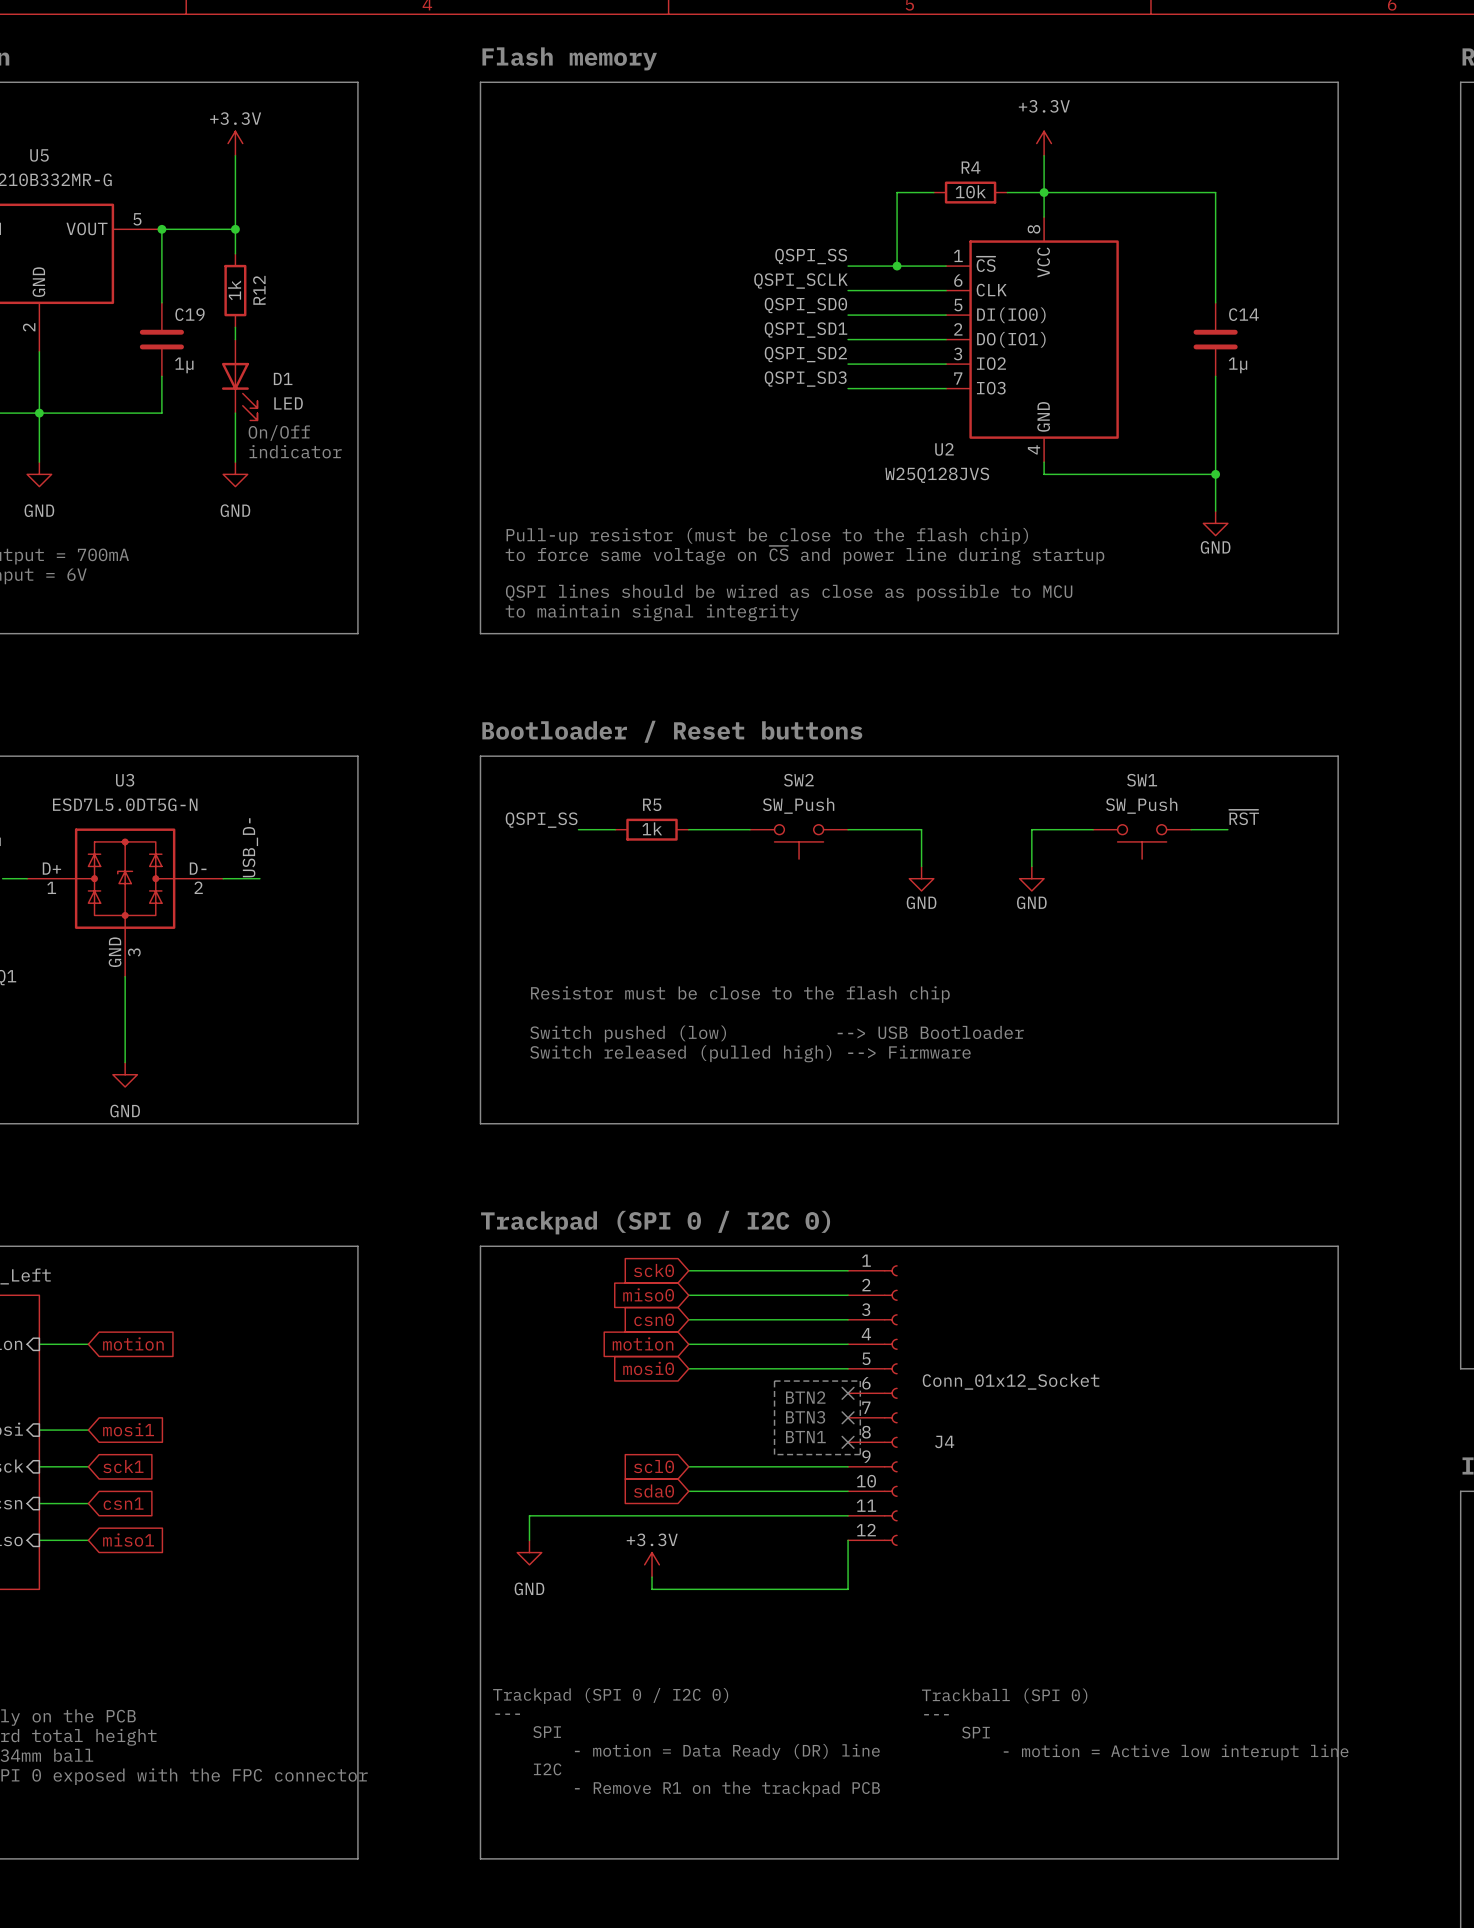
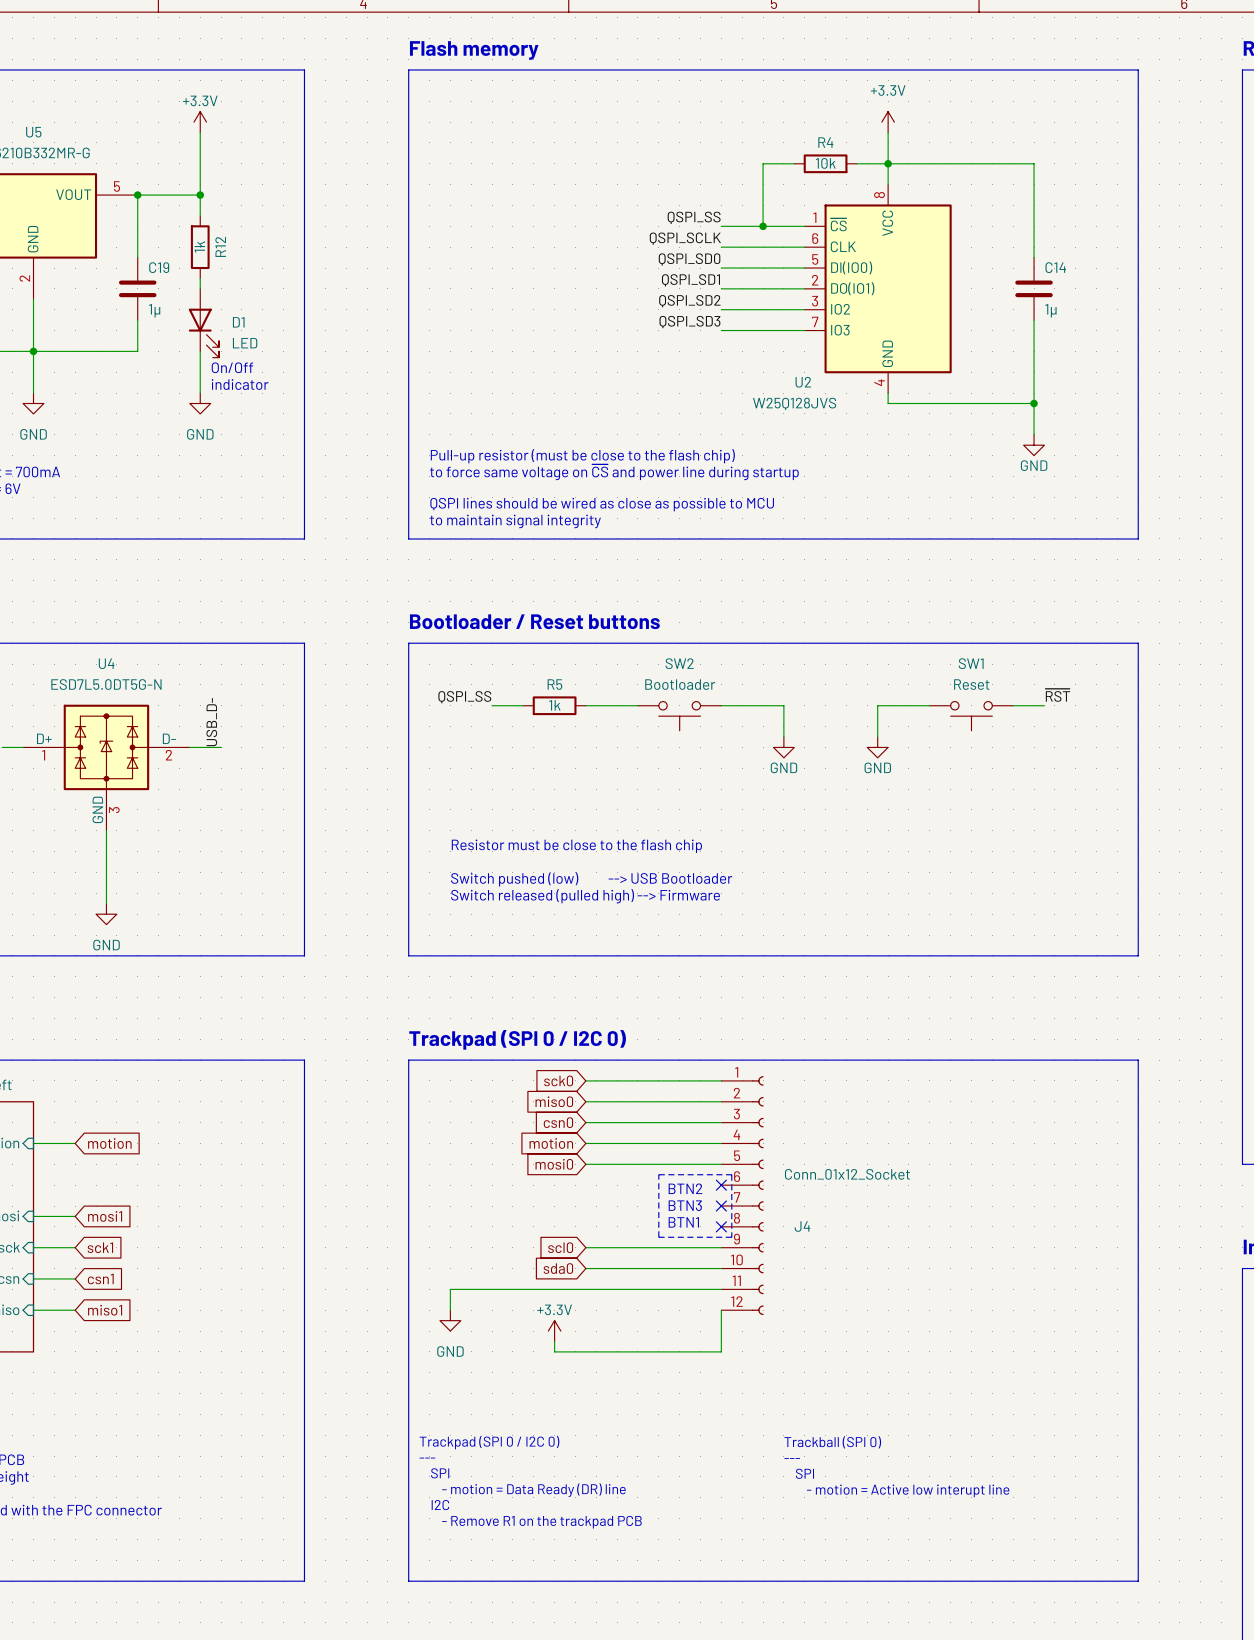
U3 name: U3 (125, 780) -> U4 (106, 663)
SW2 value: SW_Push (798, 805) -> Bootloader (680, 684)
SW1 value: SW_Push (1141, 805) -> Reset (971, 684)

